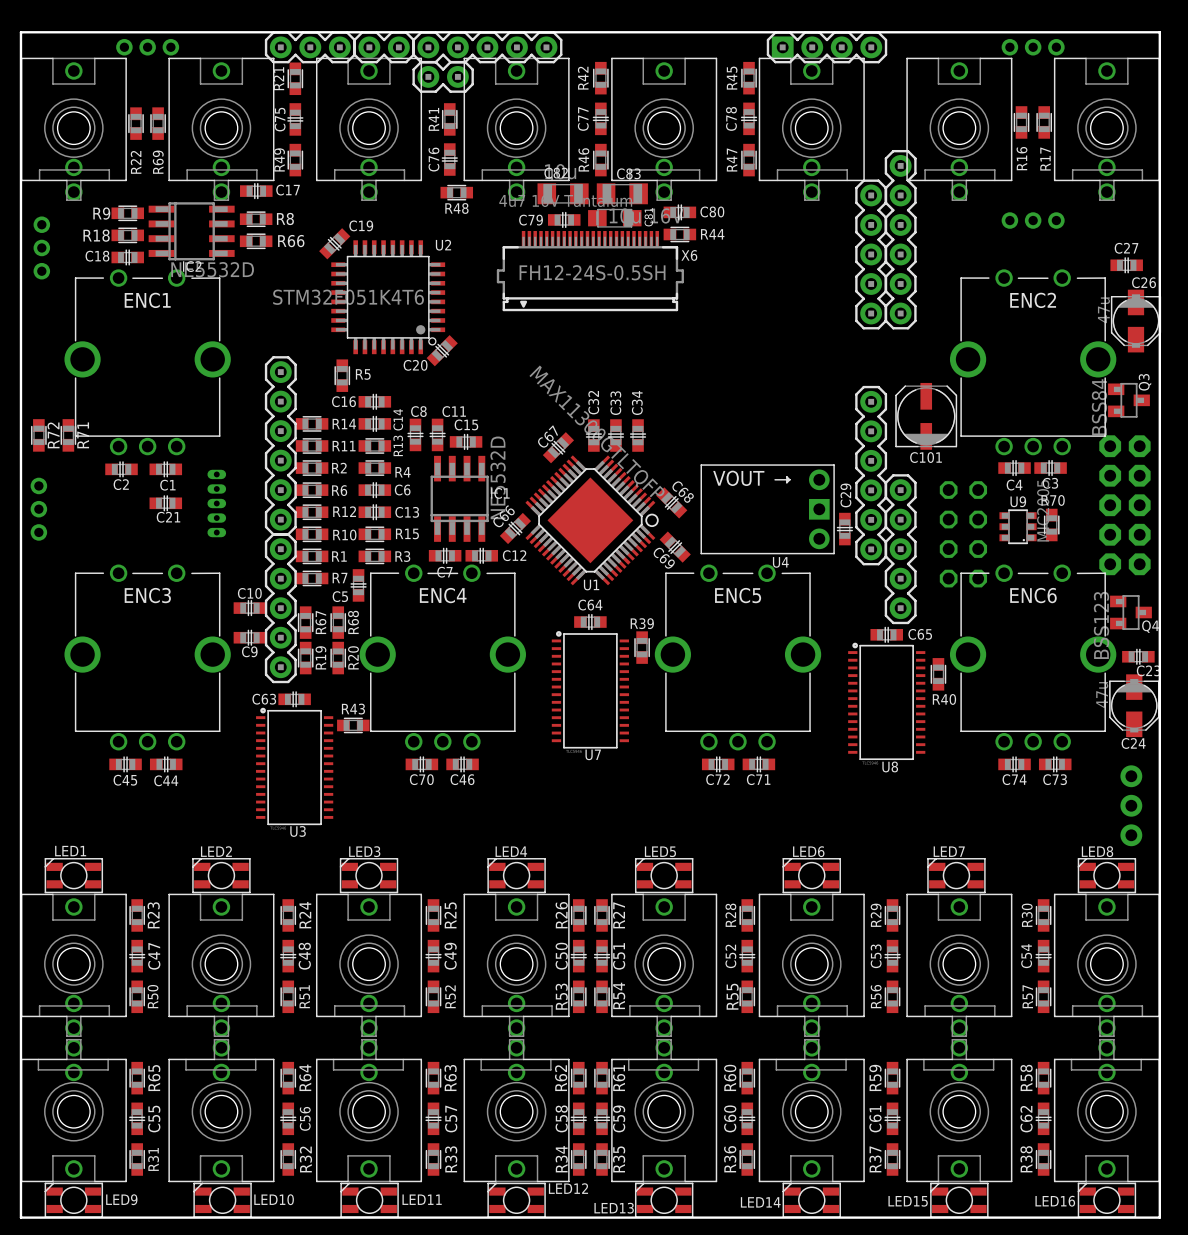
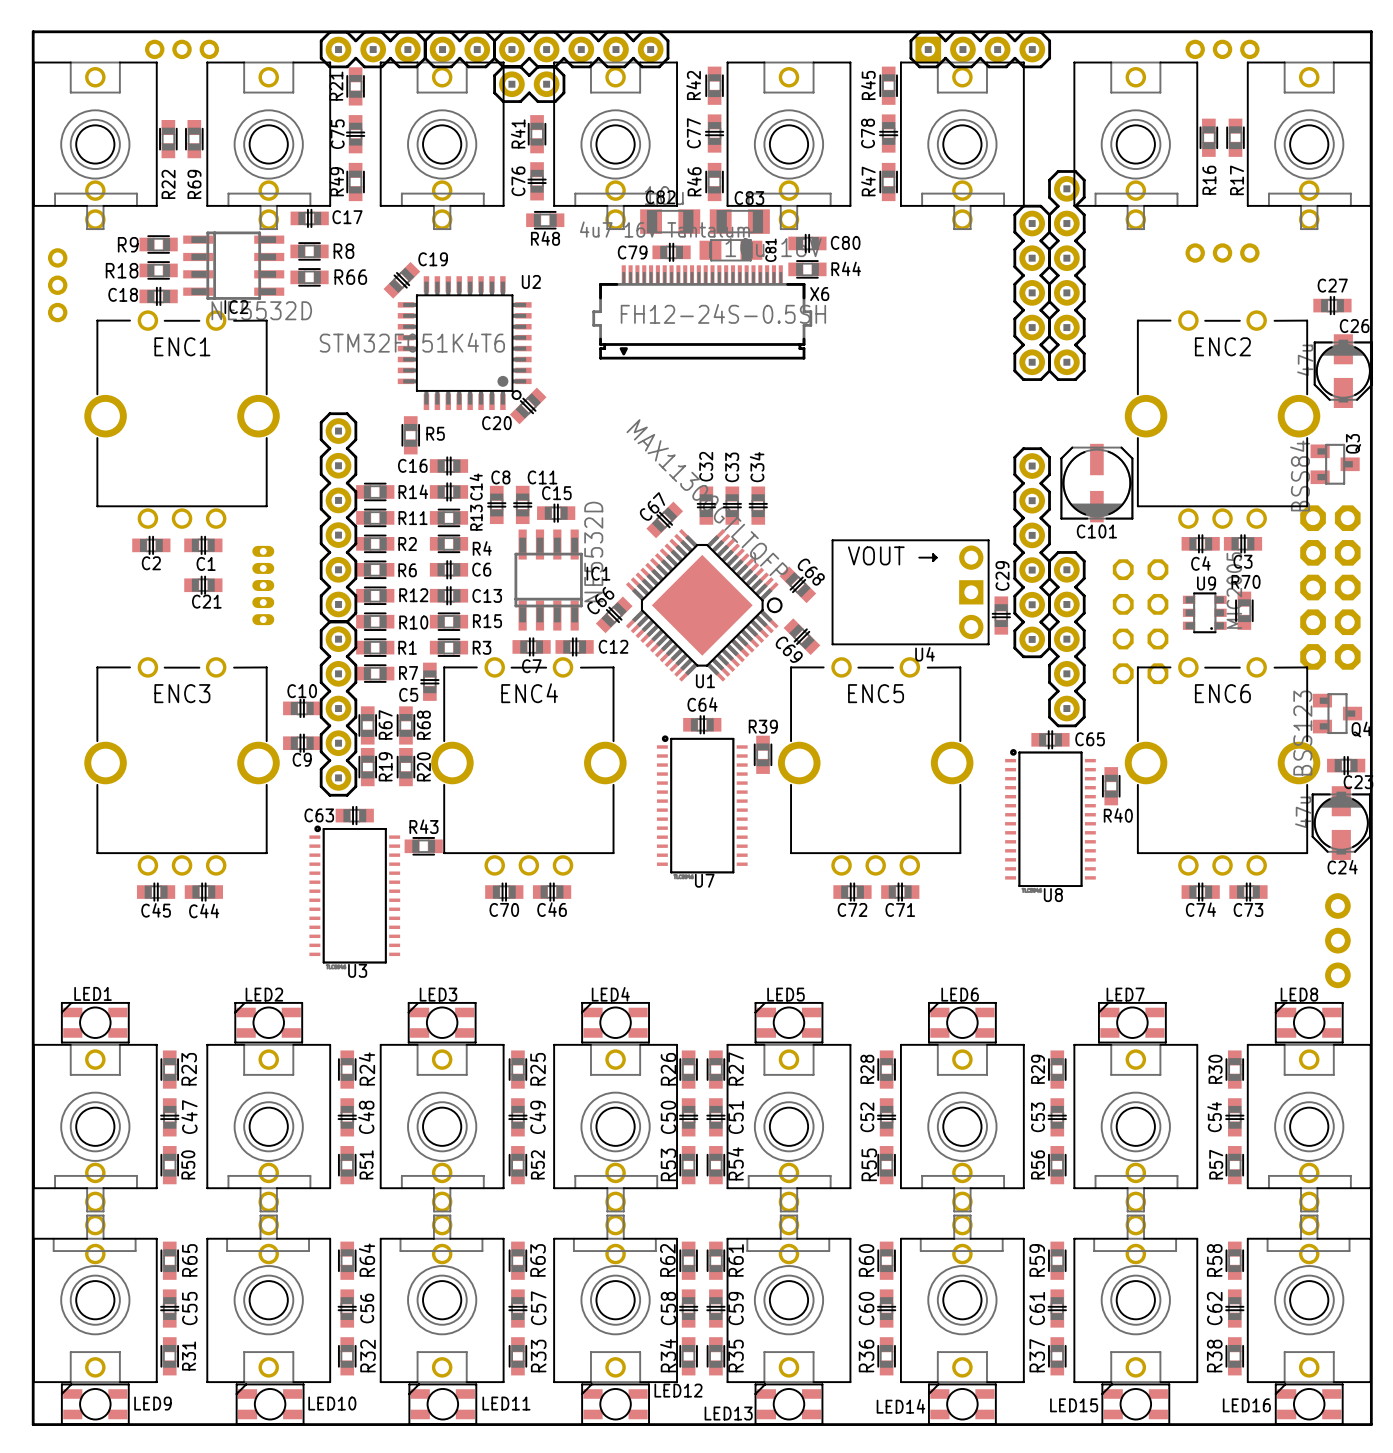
R72: (38, 435) -> none
R71: (68, 435) -> none
part: (38, 509) -> none

